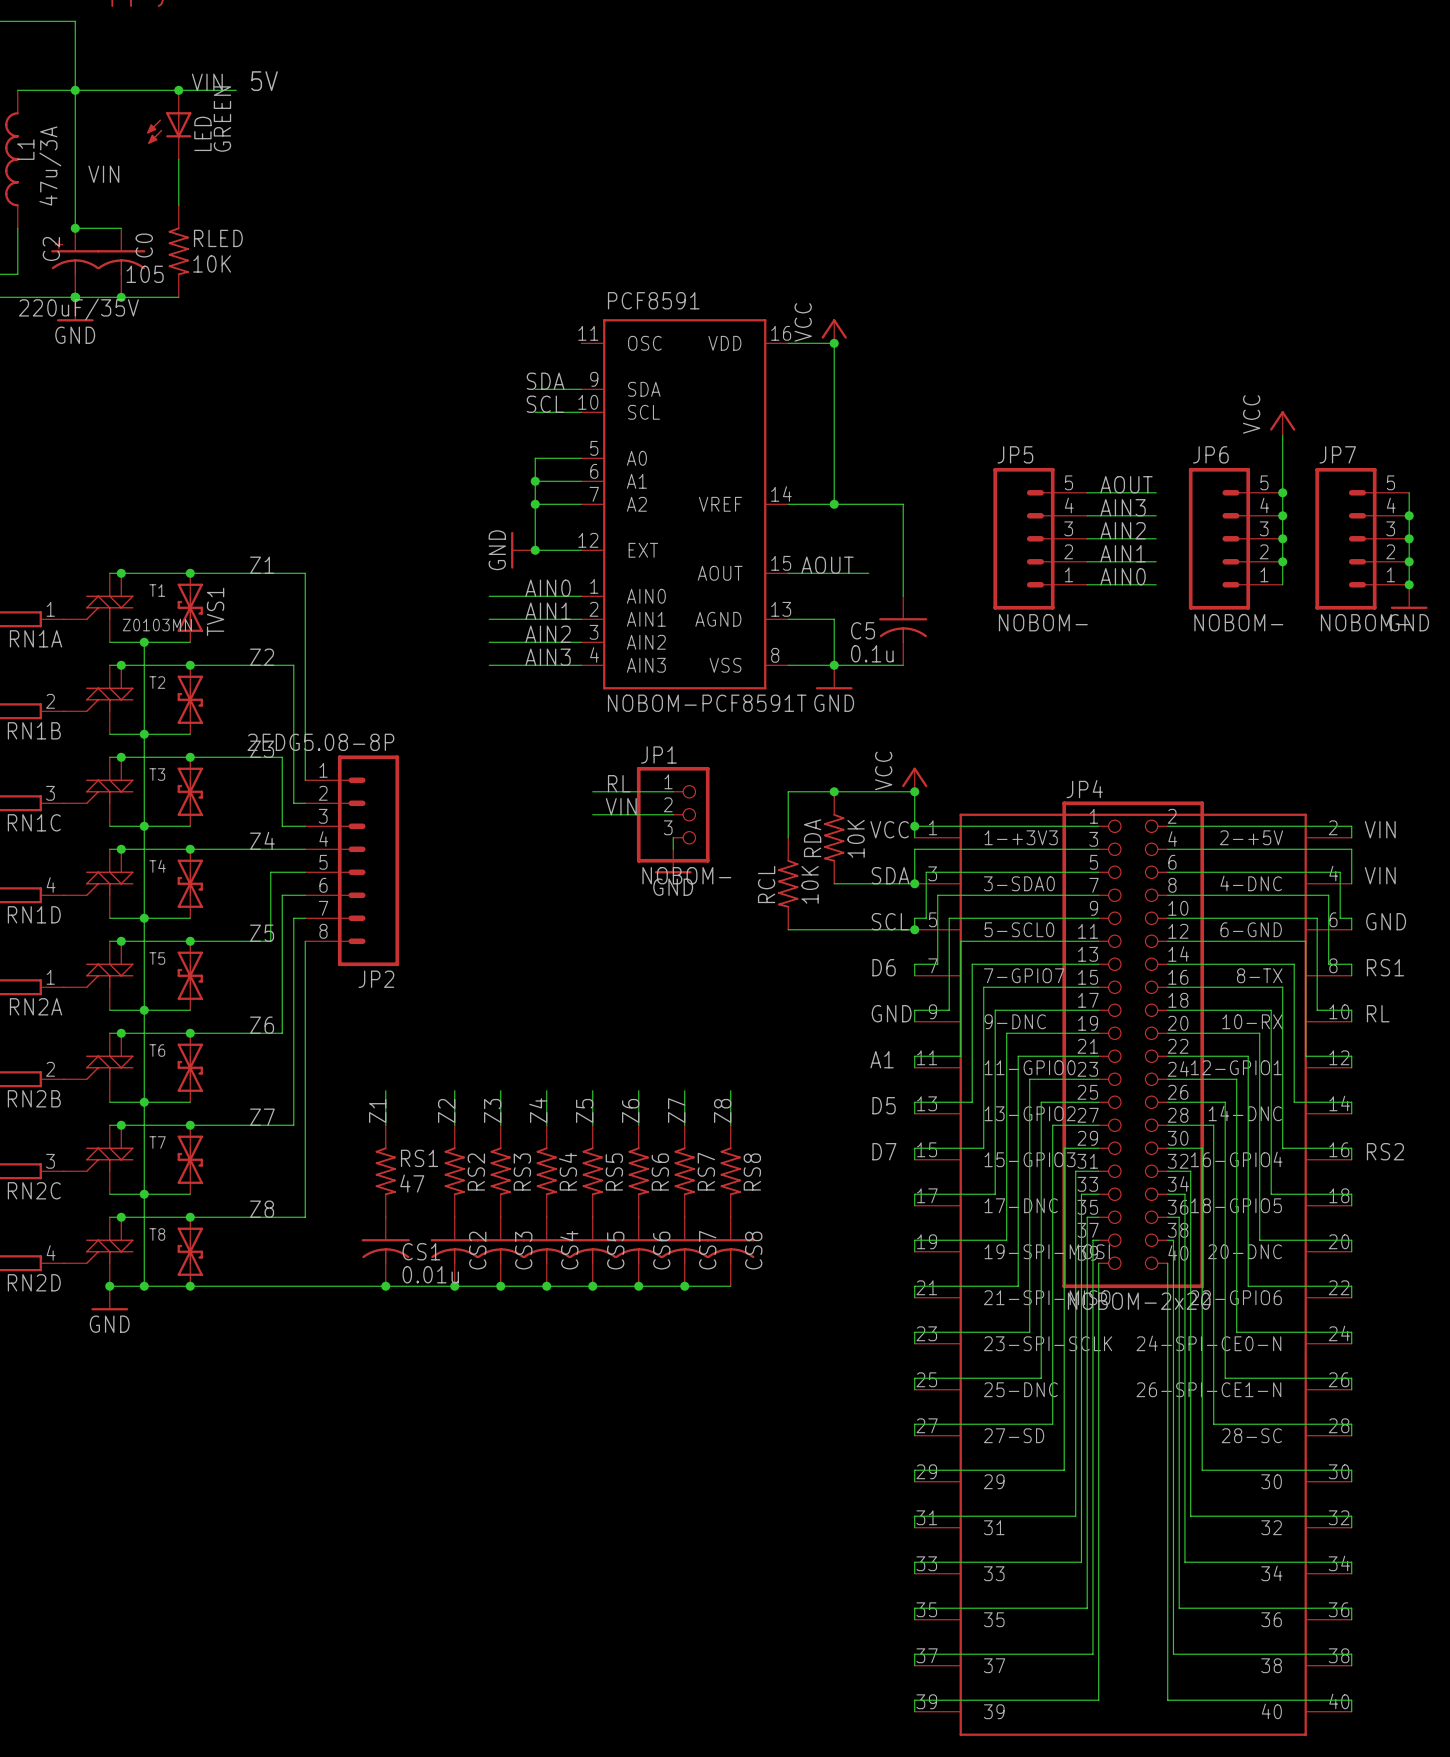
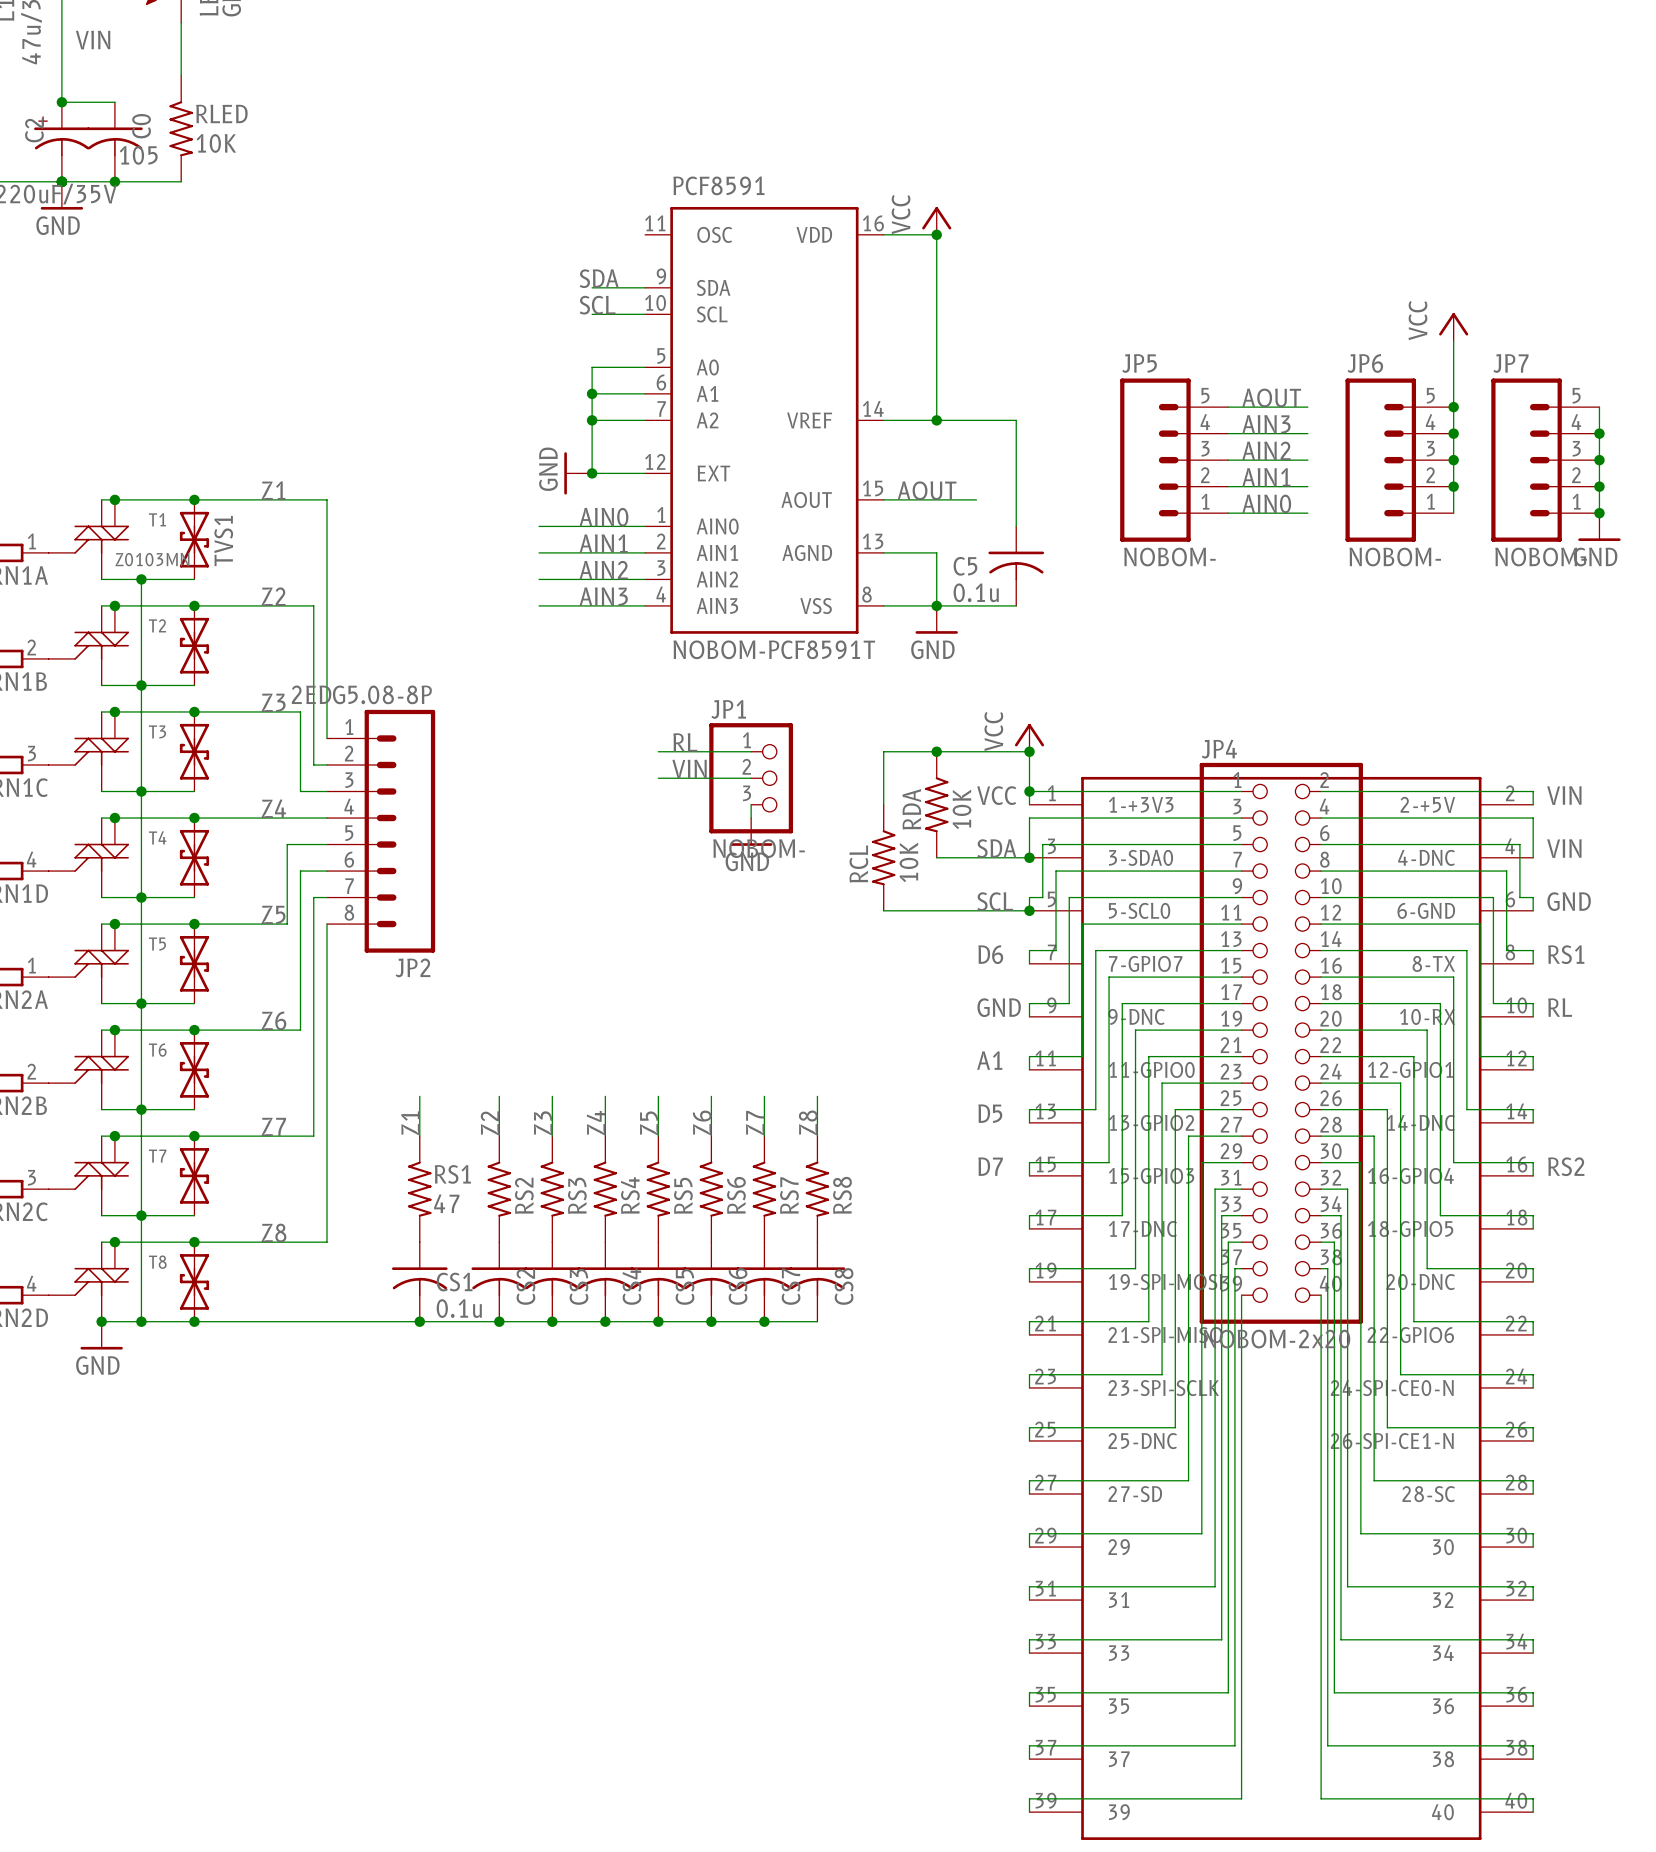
CS1 value: 0.01u (430, 1274) -> 0.1u (459, 1308)

